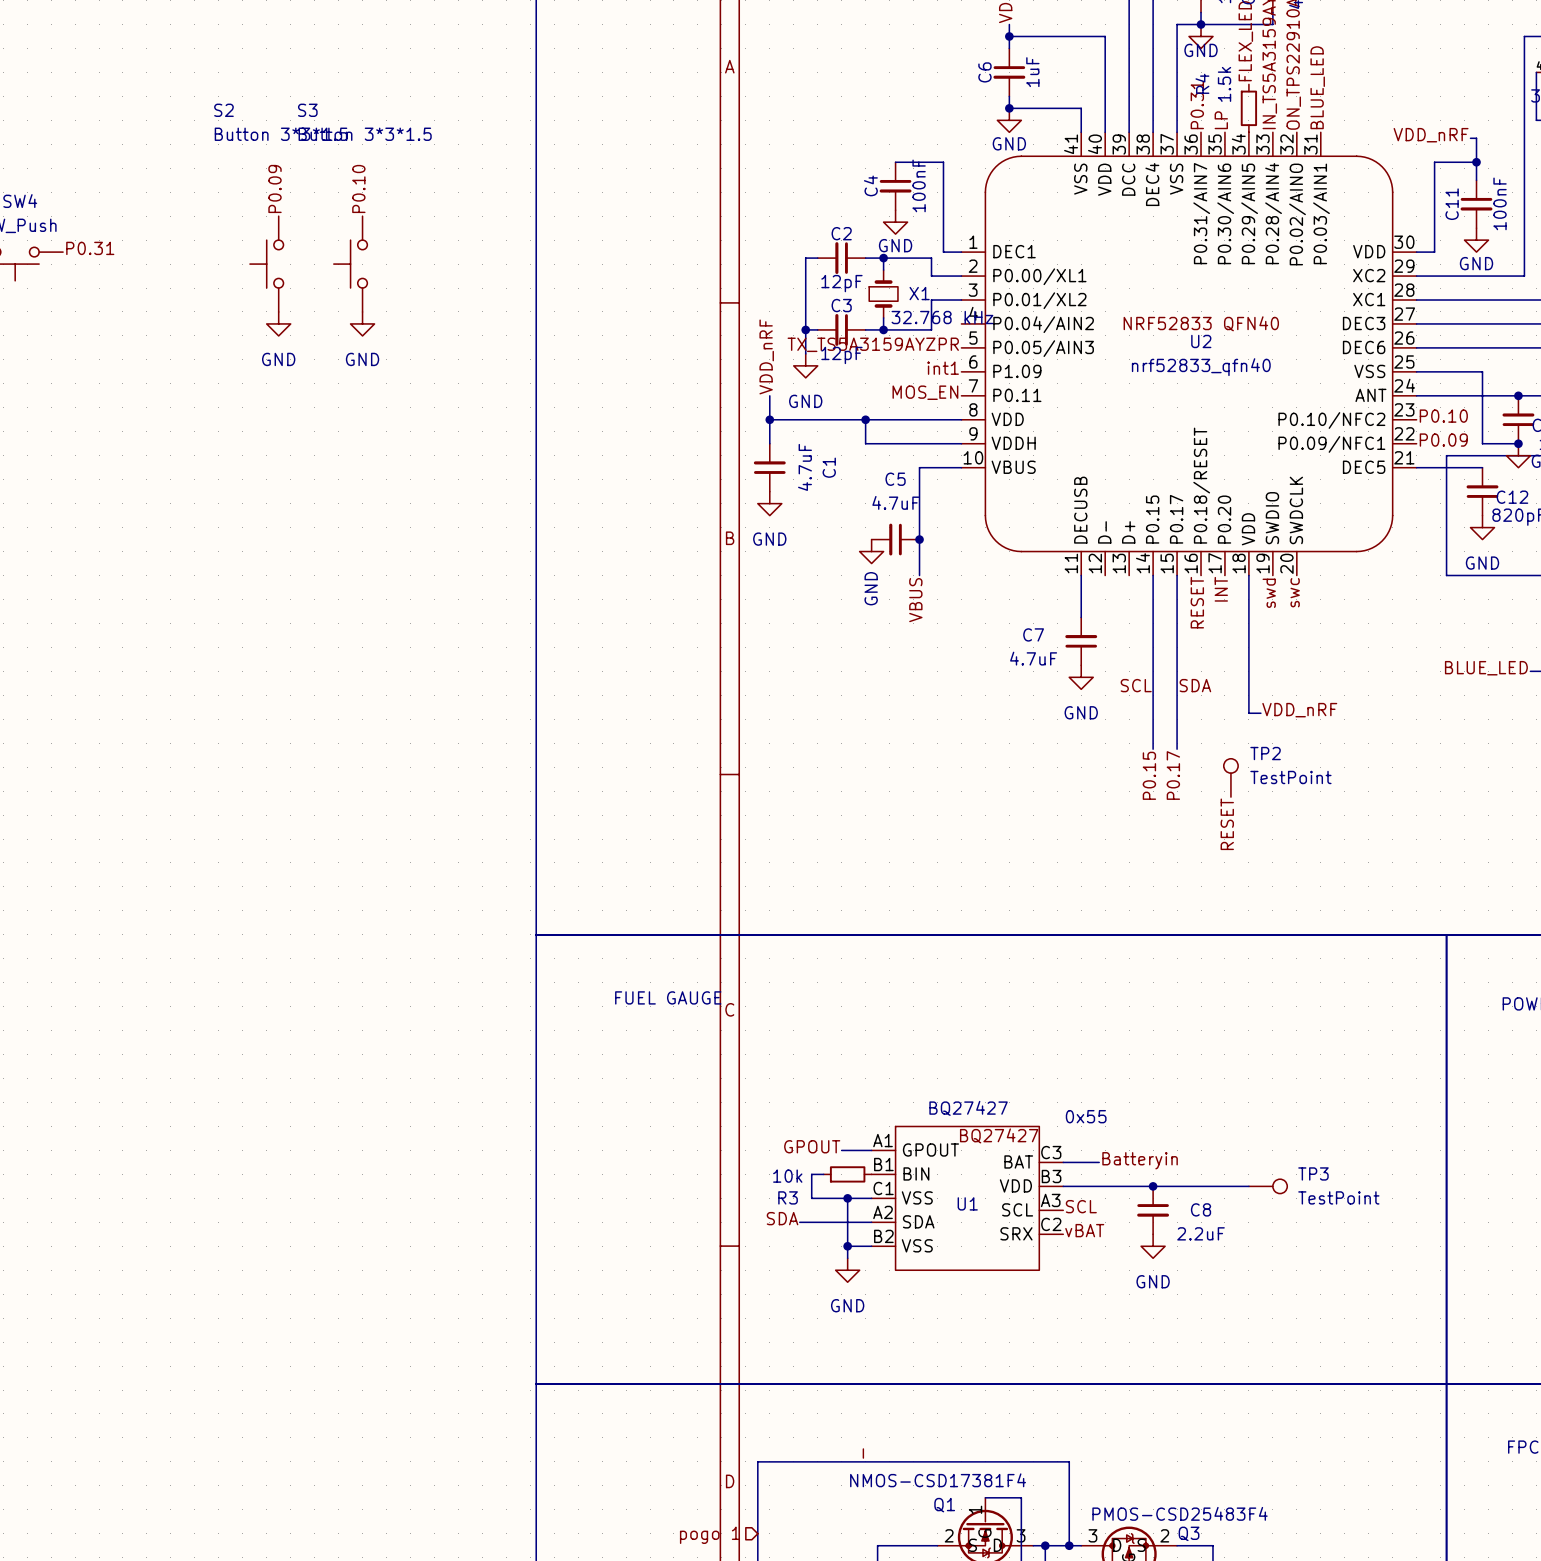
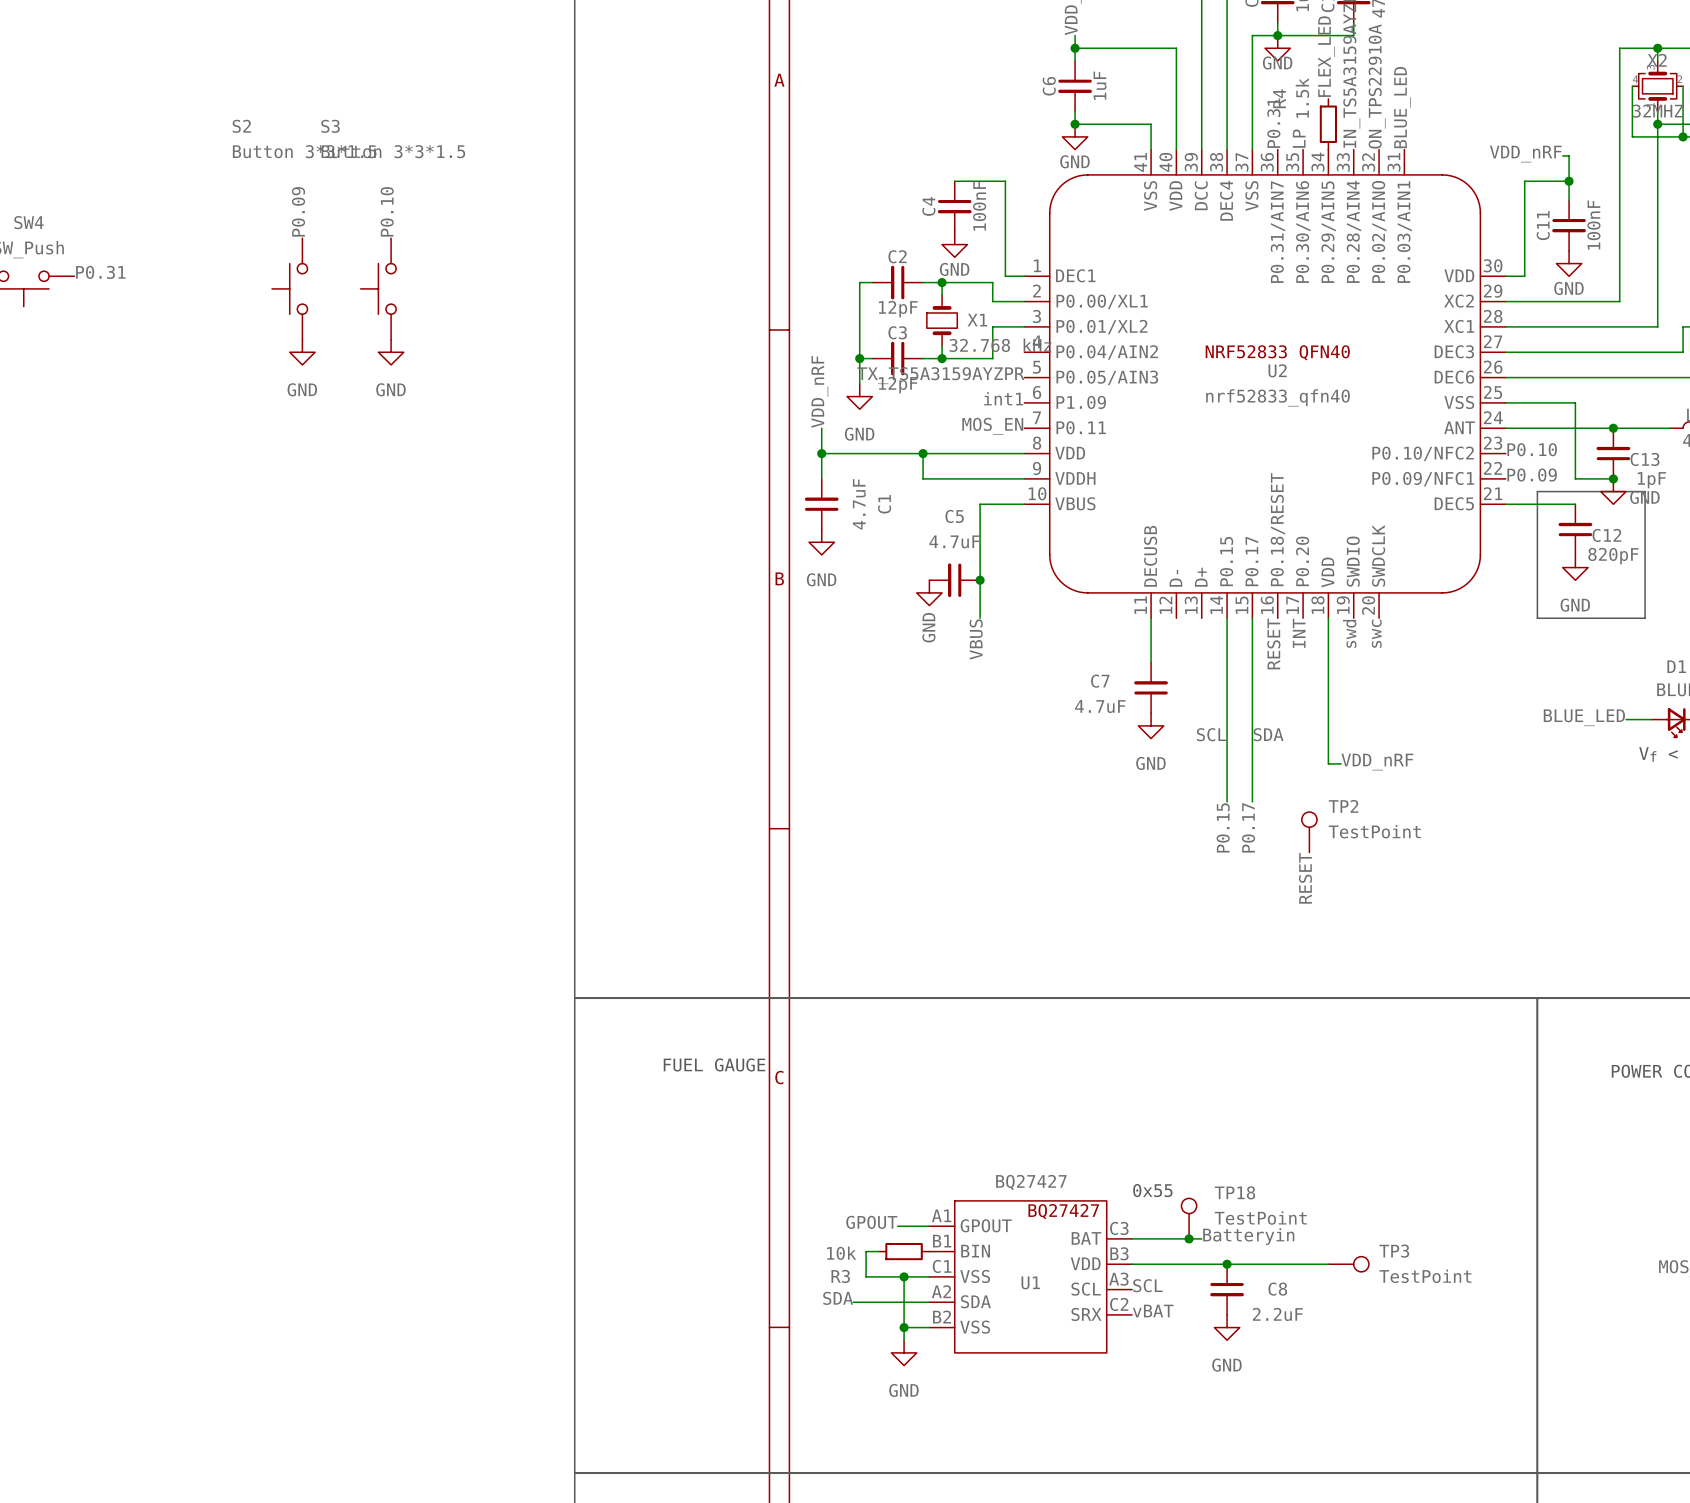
TP18: none -> TestPoint (1189, 1218)
label position: Batteryin (1140, 1160) -> Batteryin (1248, 1236)
wire: none -> (1170, 1238) (1201, 1238)
junction: none -> (1189, 1238)

